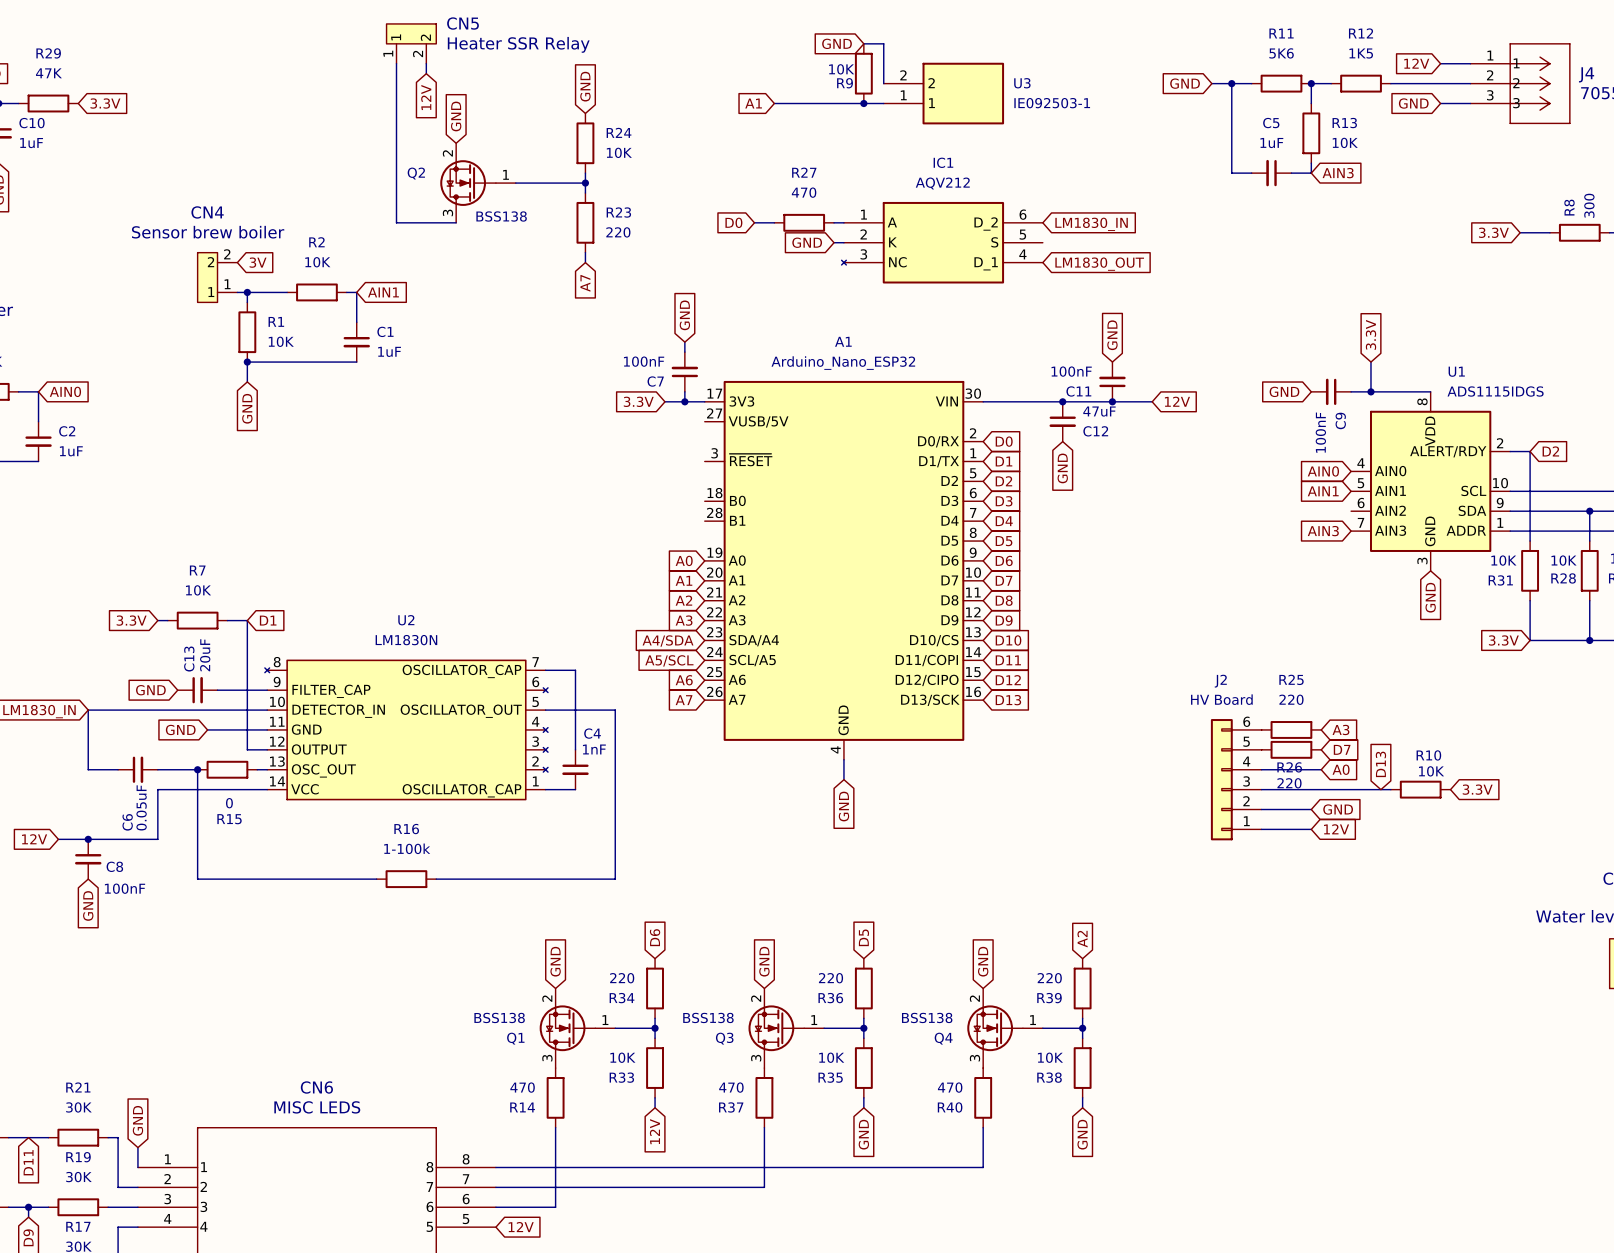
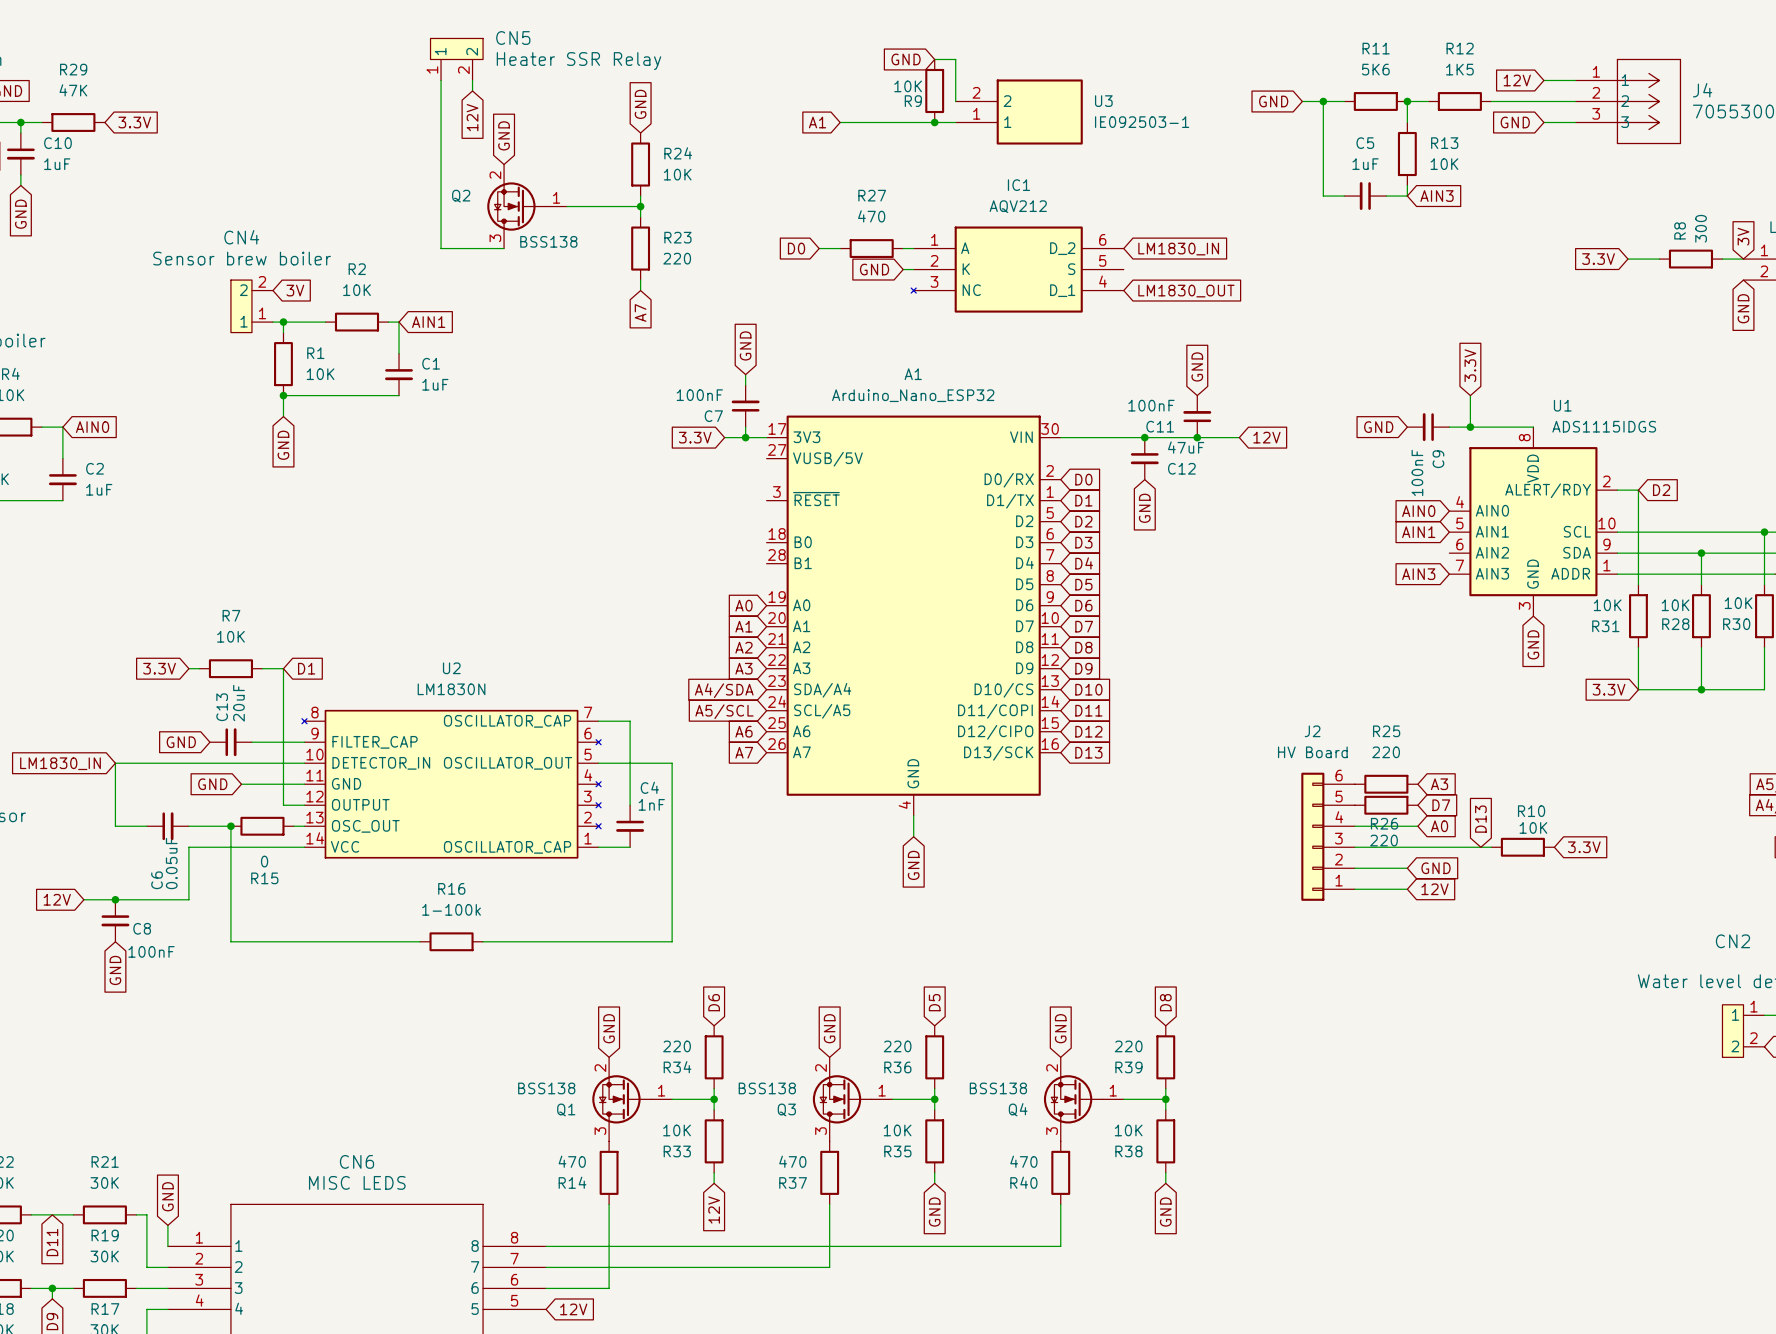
global label: A2 (1082, 939) -> D8 (1165, 1002)

